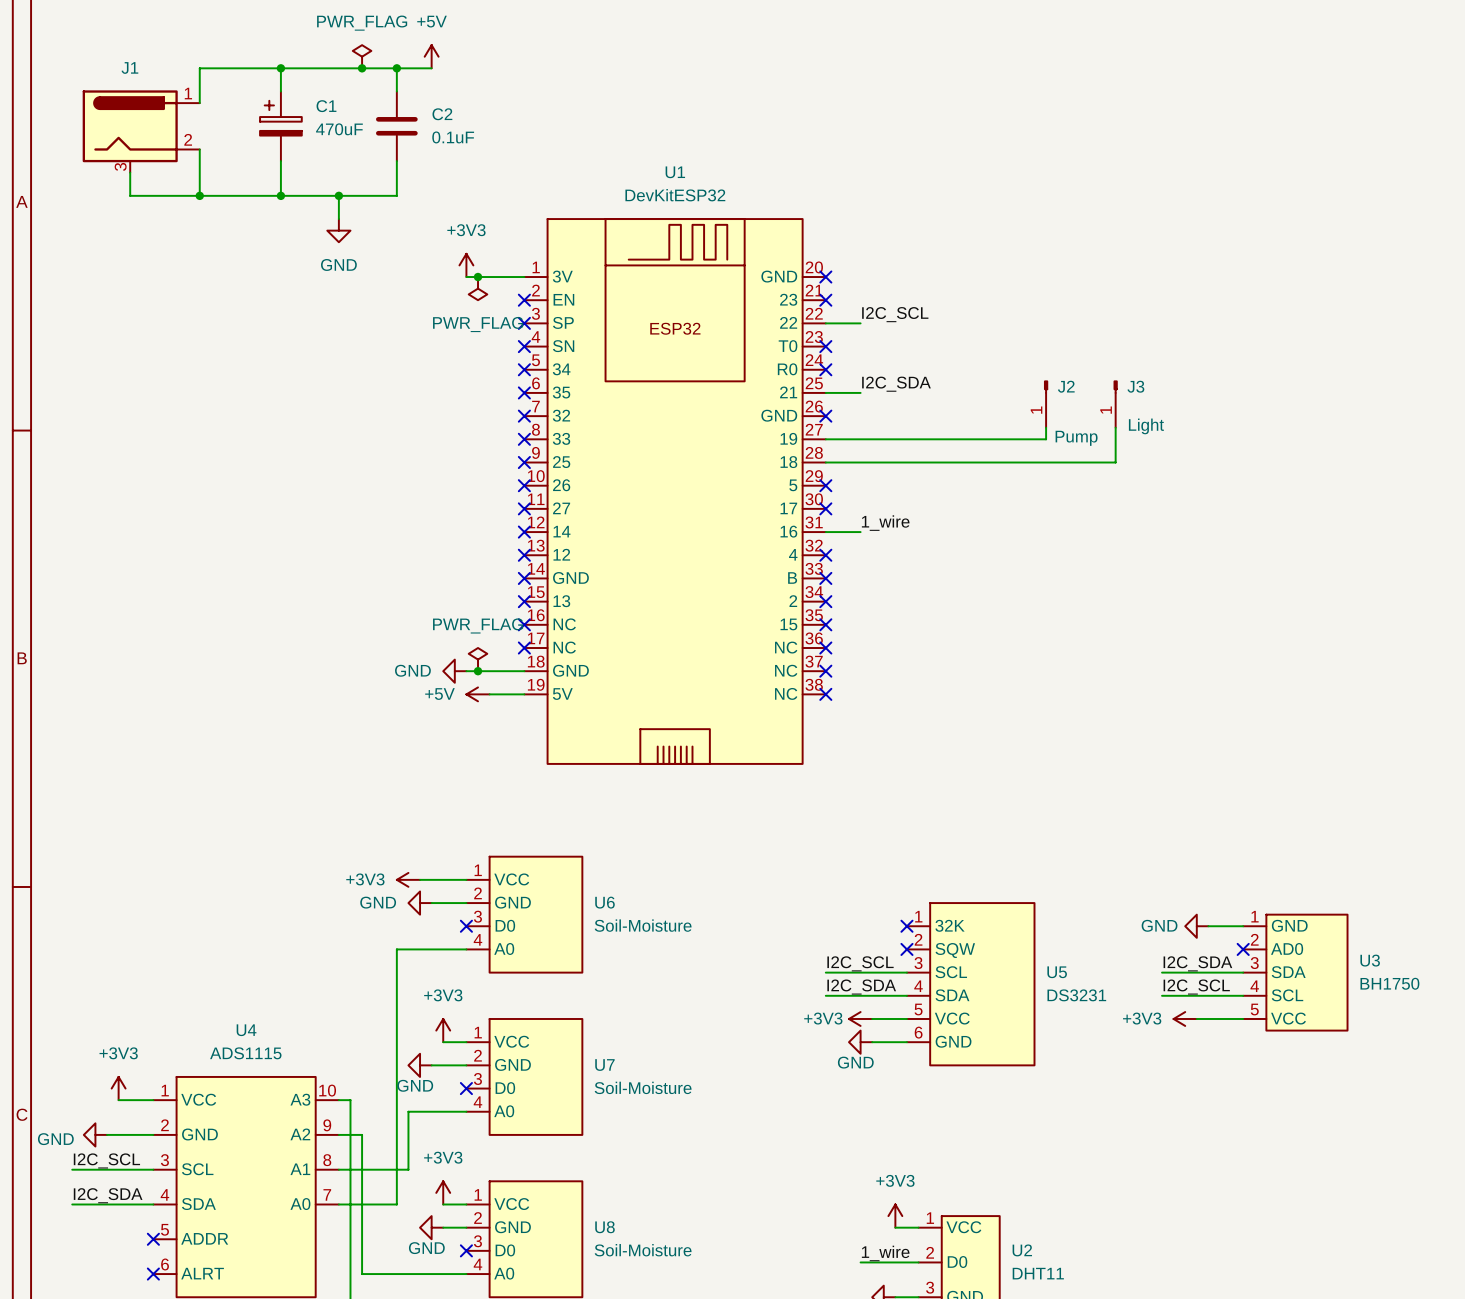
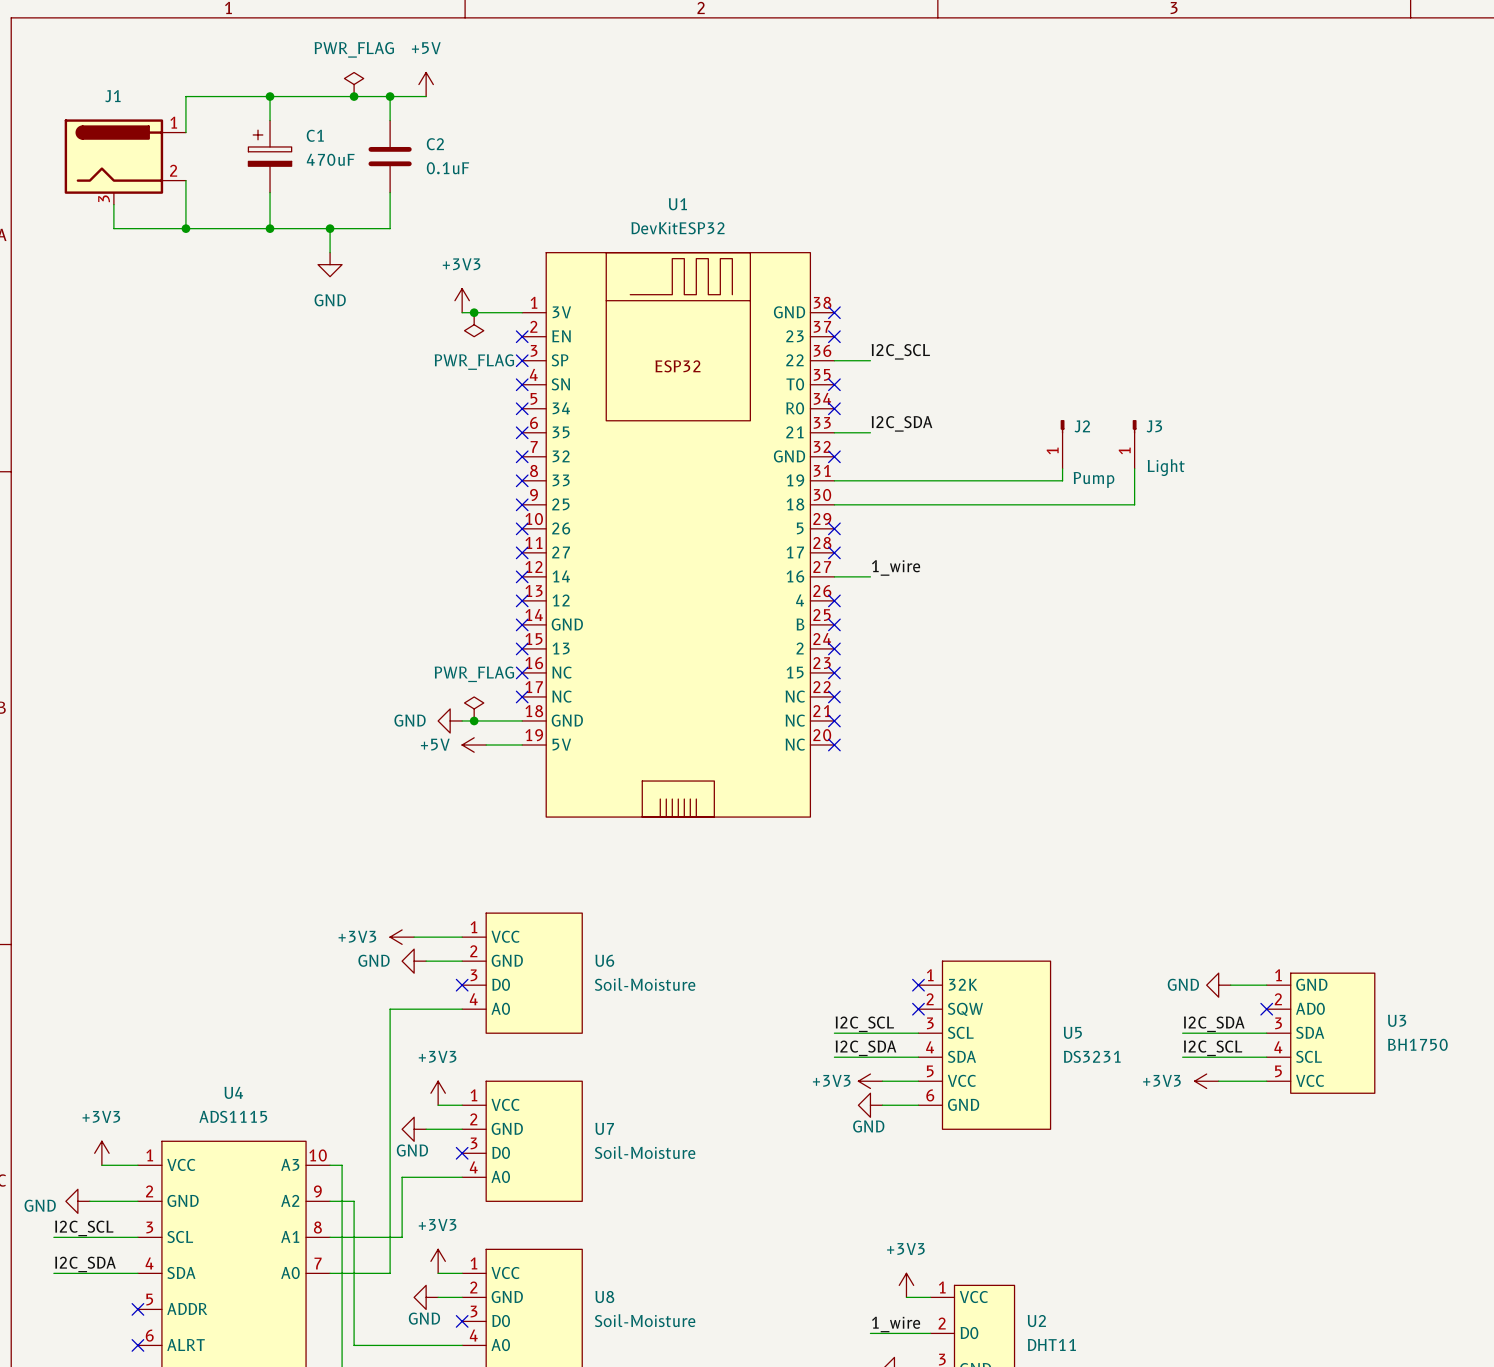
U1 symbol: [524, 219, 826, 764] -> [522, 252, 835, 818]

